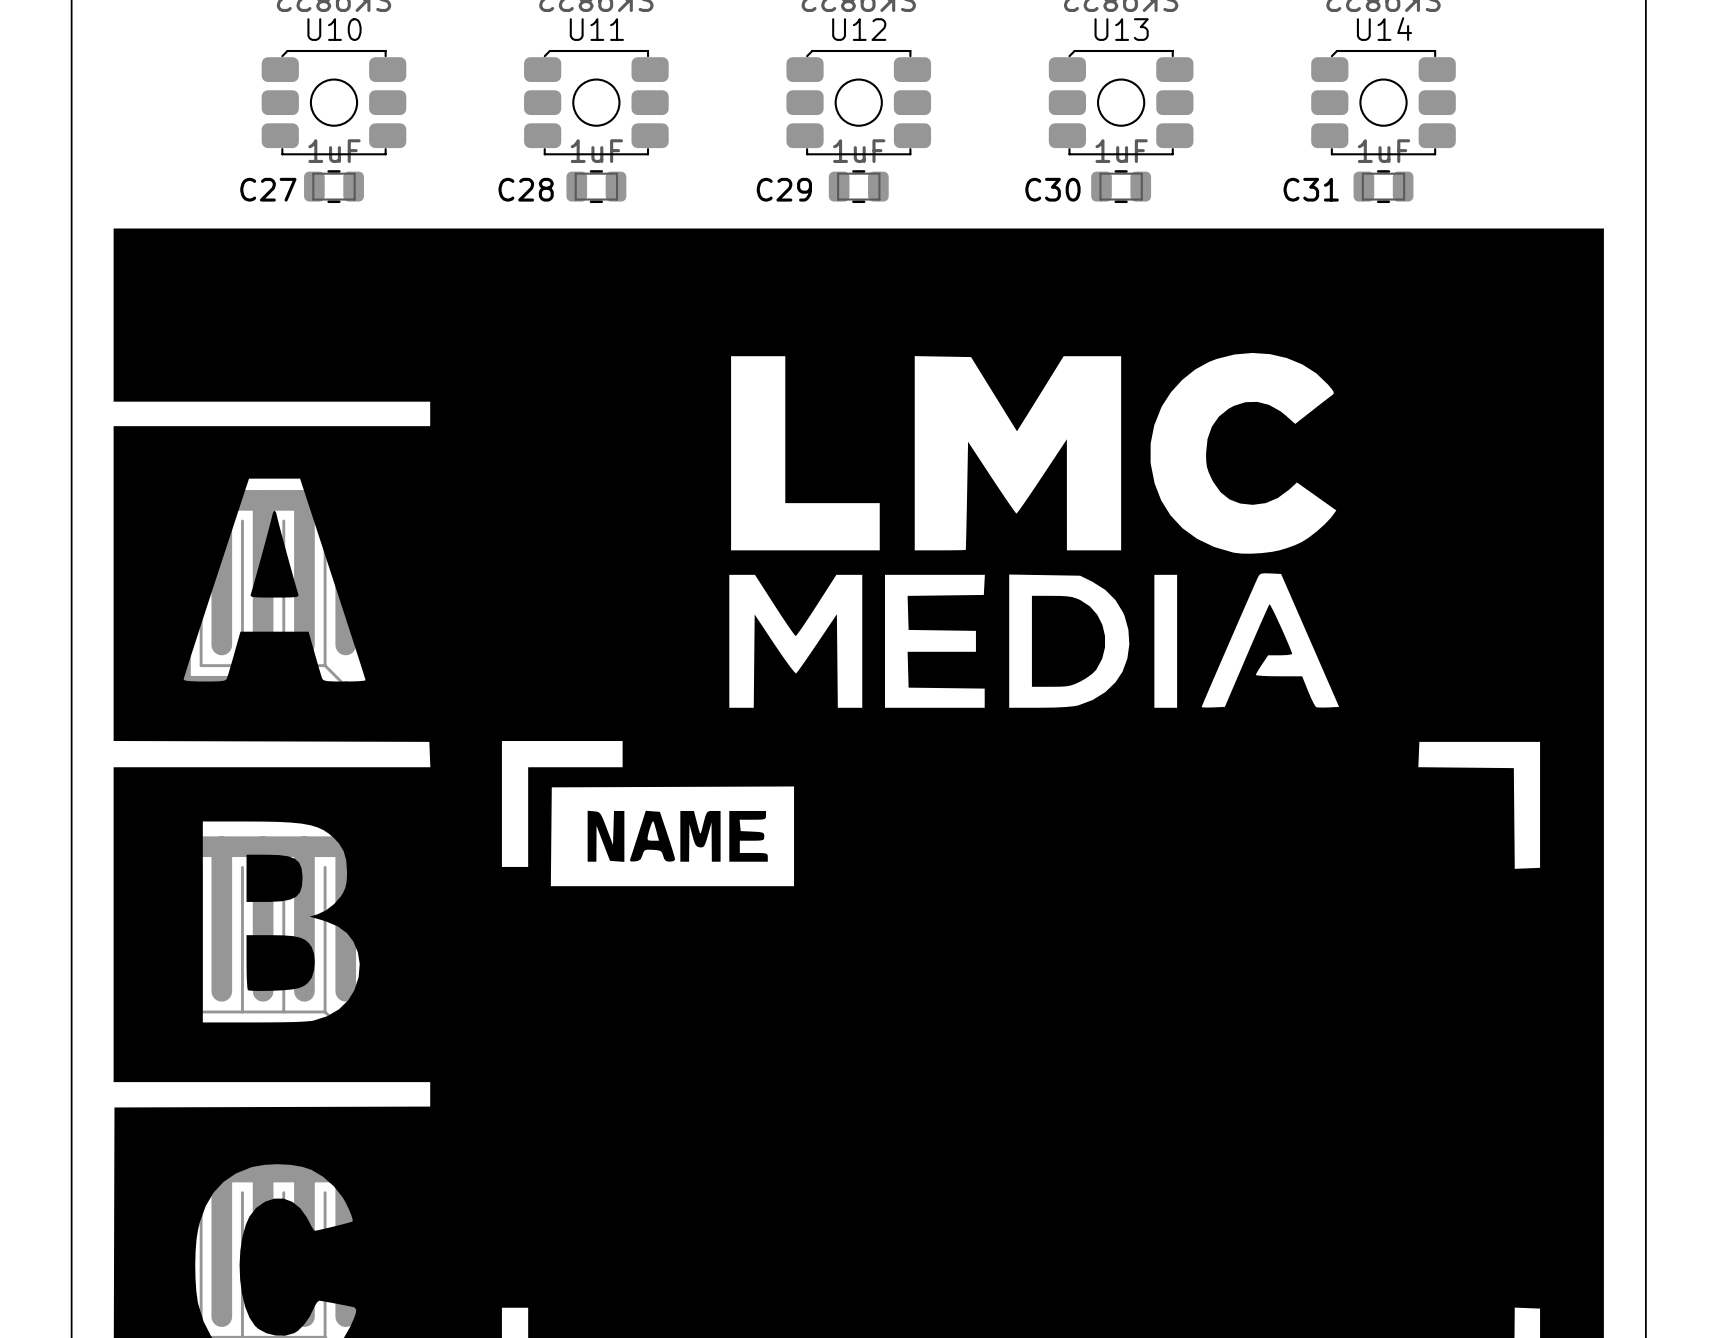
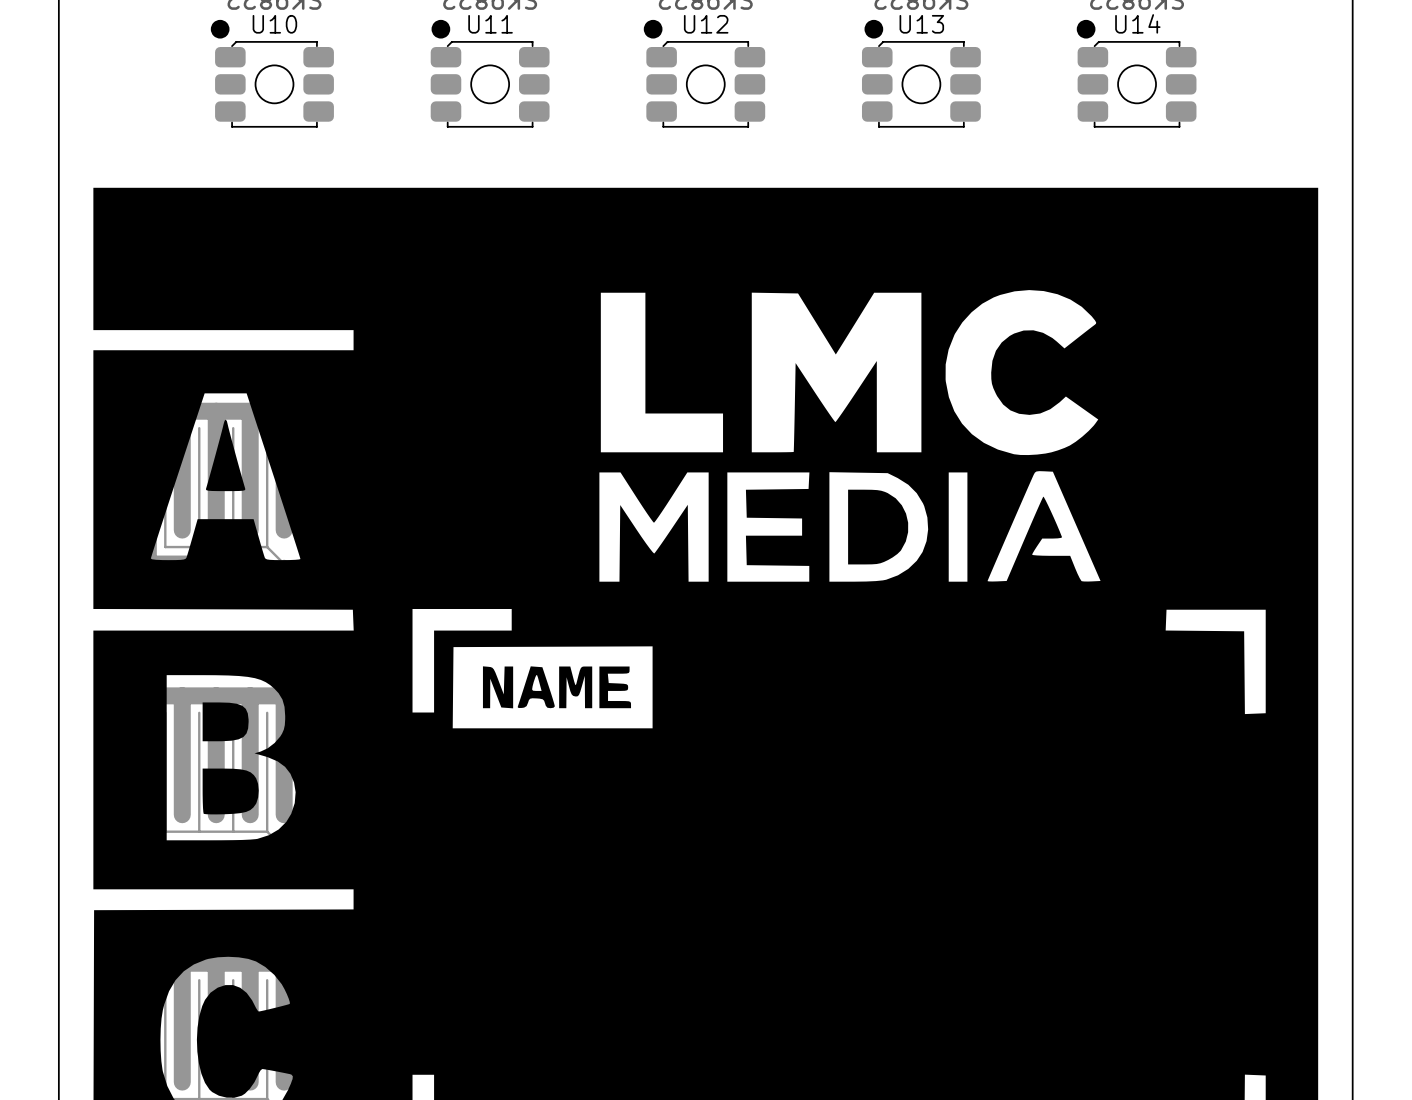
drawing: none -> [210, 19, 230, 39]
drawing: none -> [431, 19, 451, 39]
drawing: none -> [643, 19, 663, 39]
drawing: none -> [864, 19, 884, 39]
drawing: none -> [1076, 19, 1096, 39]
C27: 1uF (334, 186) -> none
C28: 1uF (596, 186) -> none
C29: 1uF (858, 186) -> none
C30: 1uF (1121, 186) -> none
C31: 1uF (1383, 186) -> none

